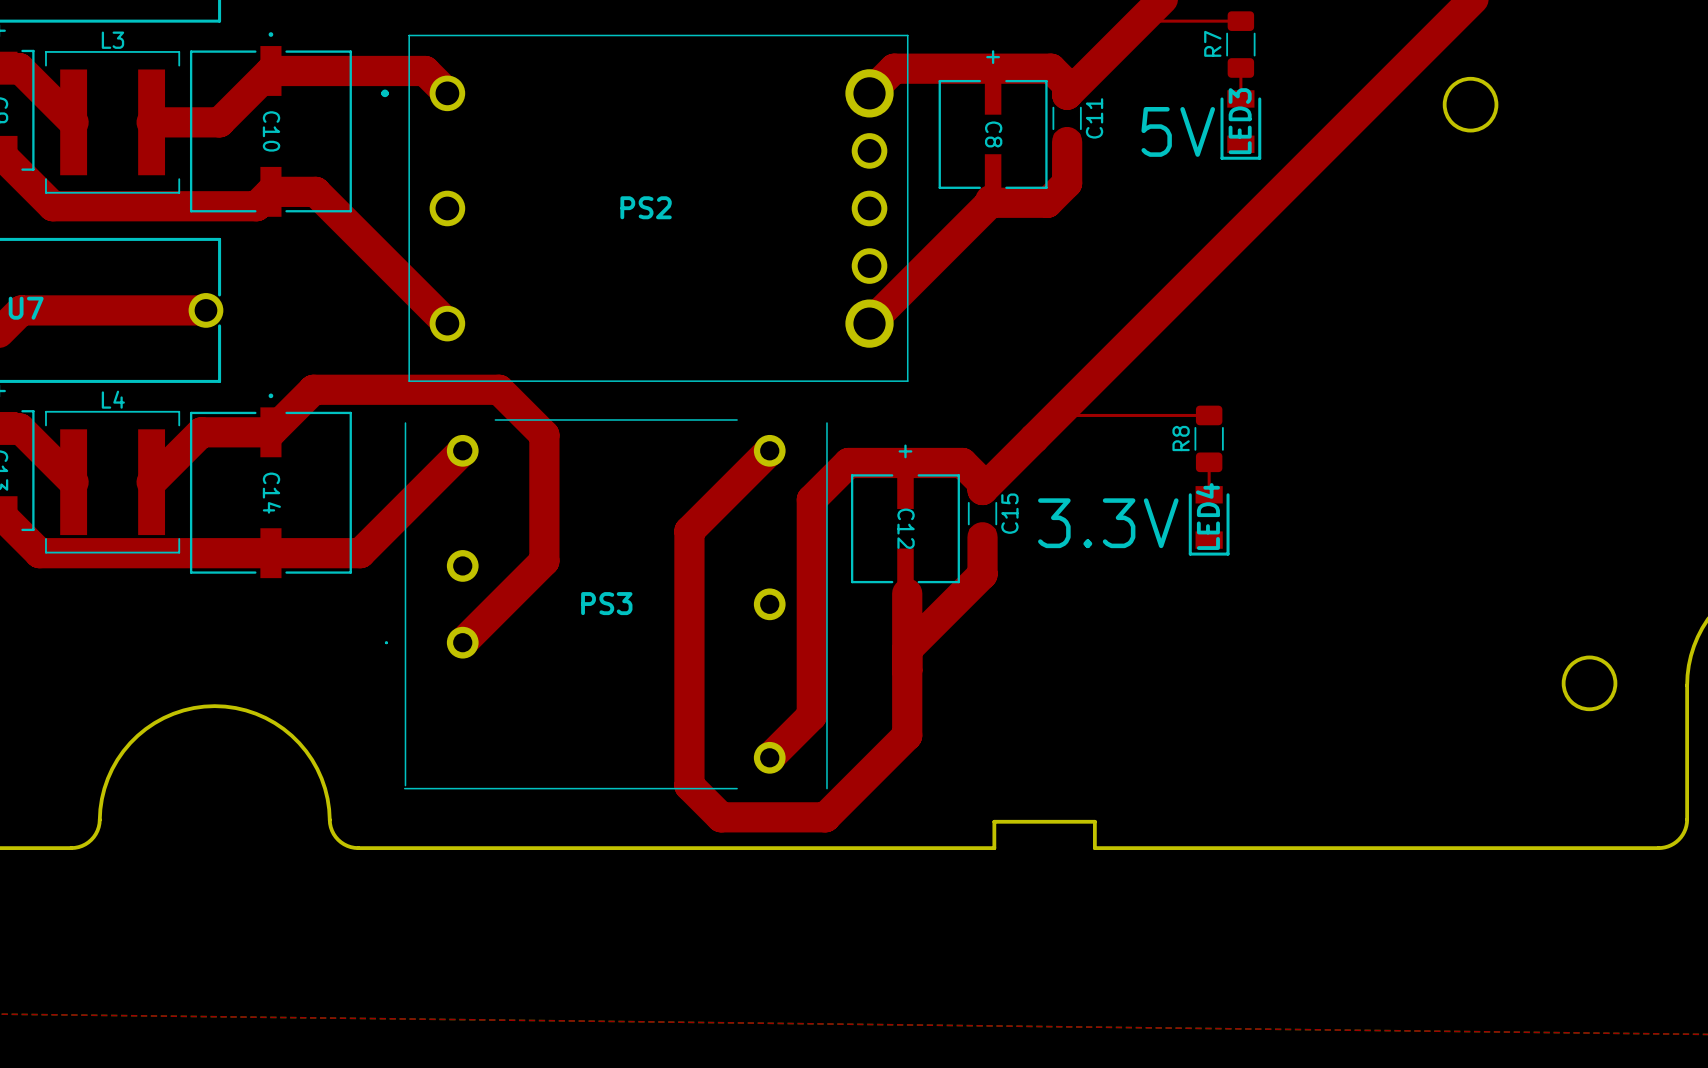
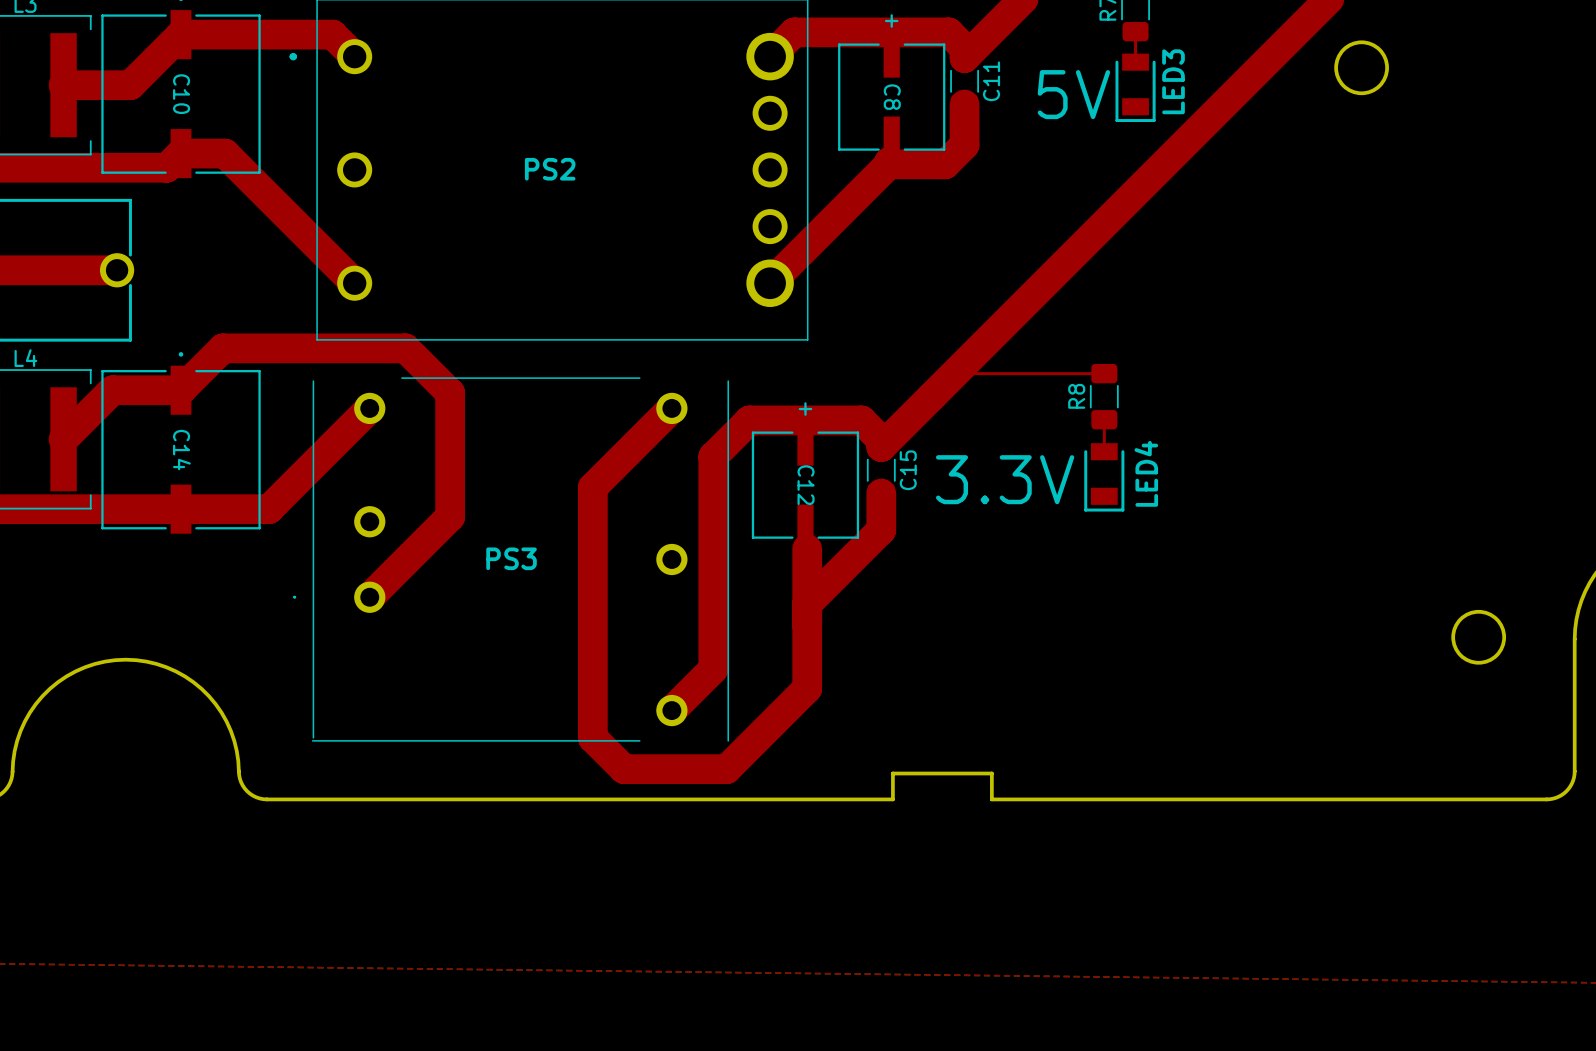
LED3 name position: LED3 (1240, 121) -> LED3 (1173, 81)
LED4 name position: LED4 (1207, 516) -> LED4 (1146, 473)

